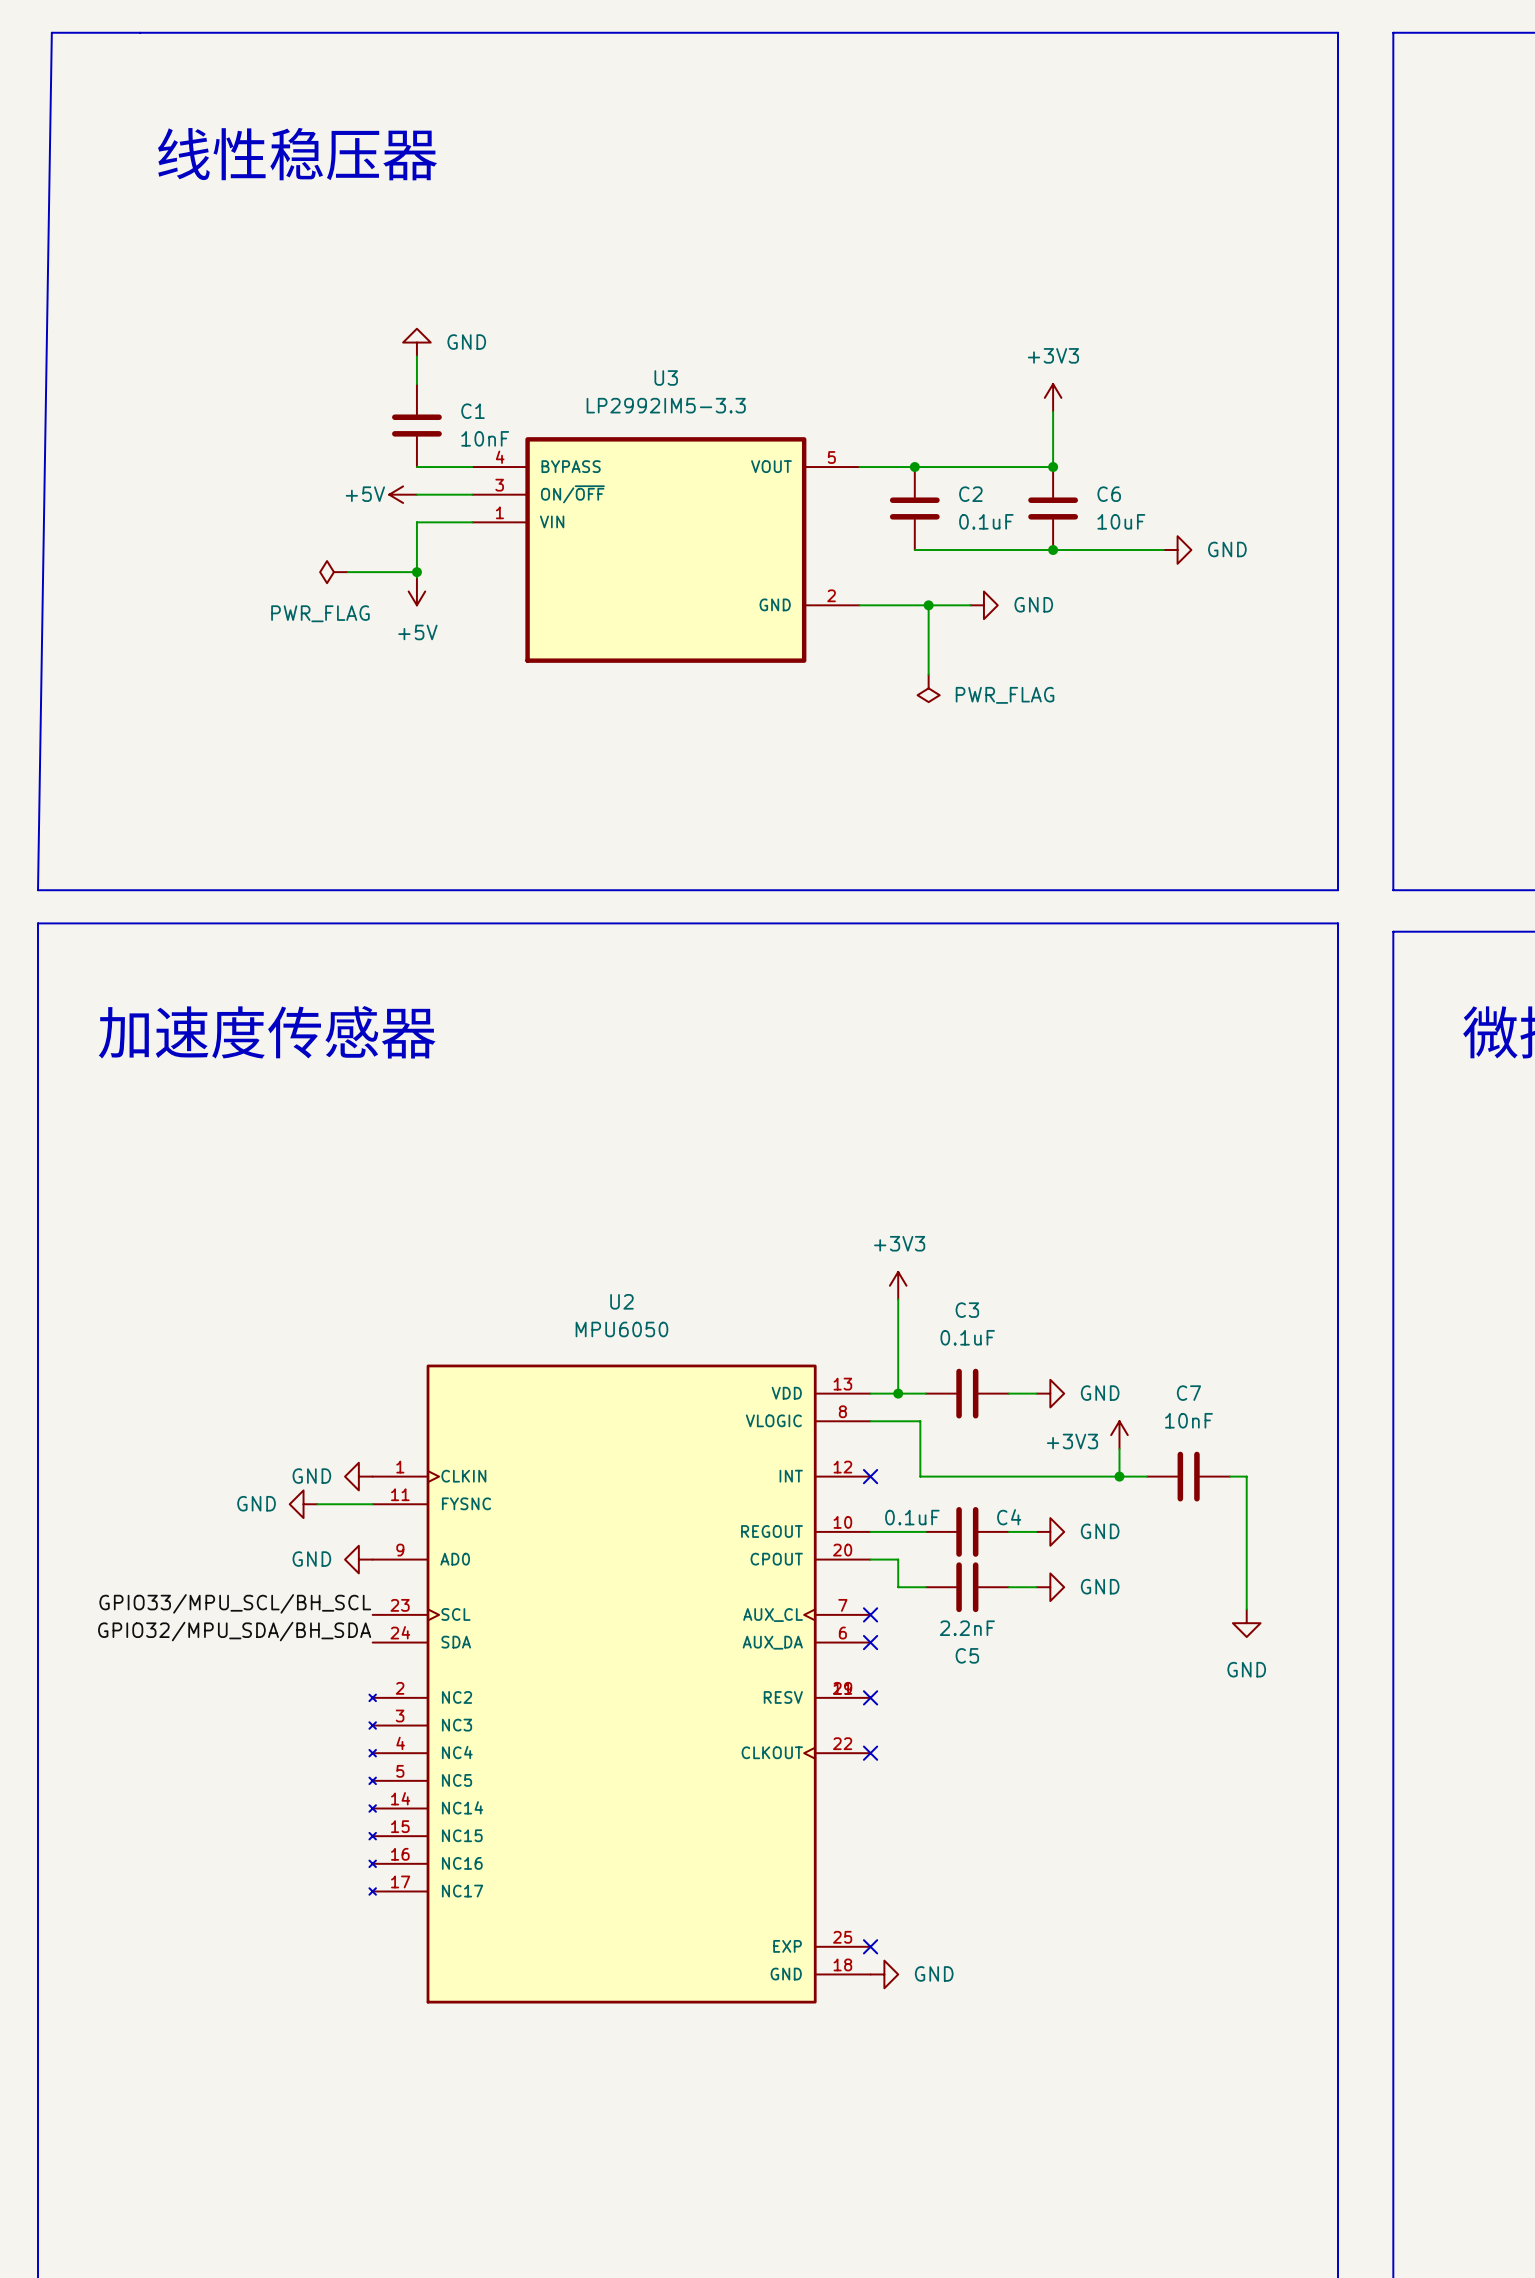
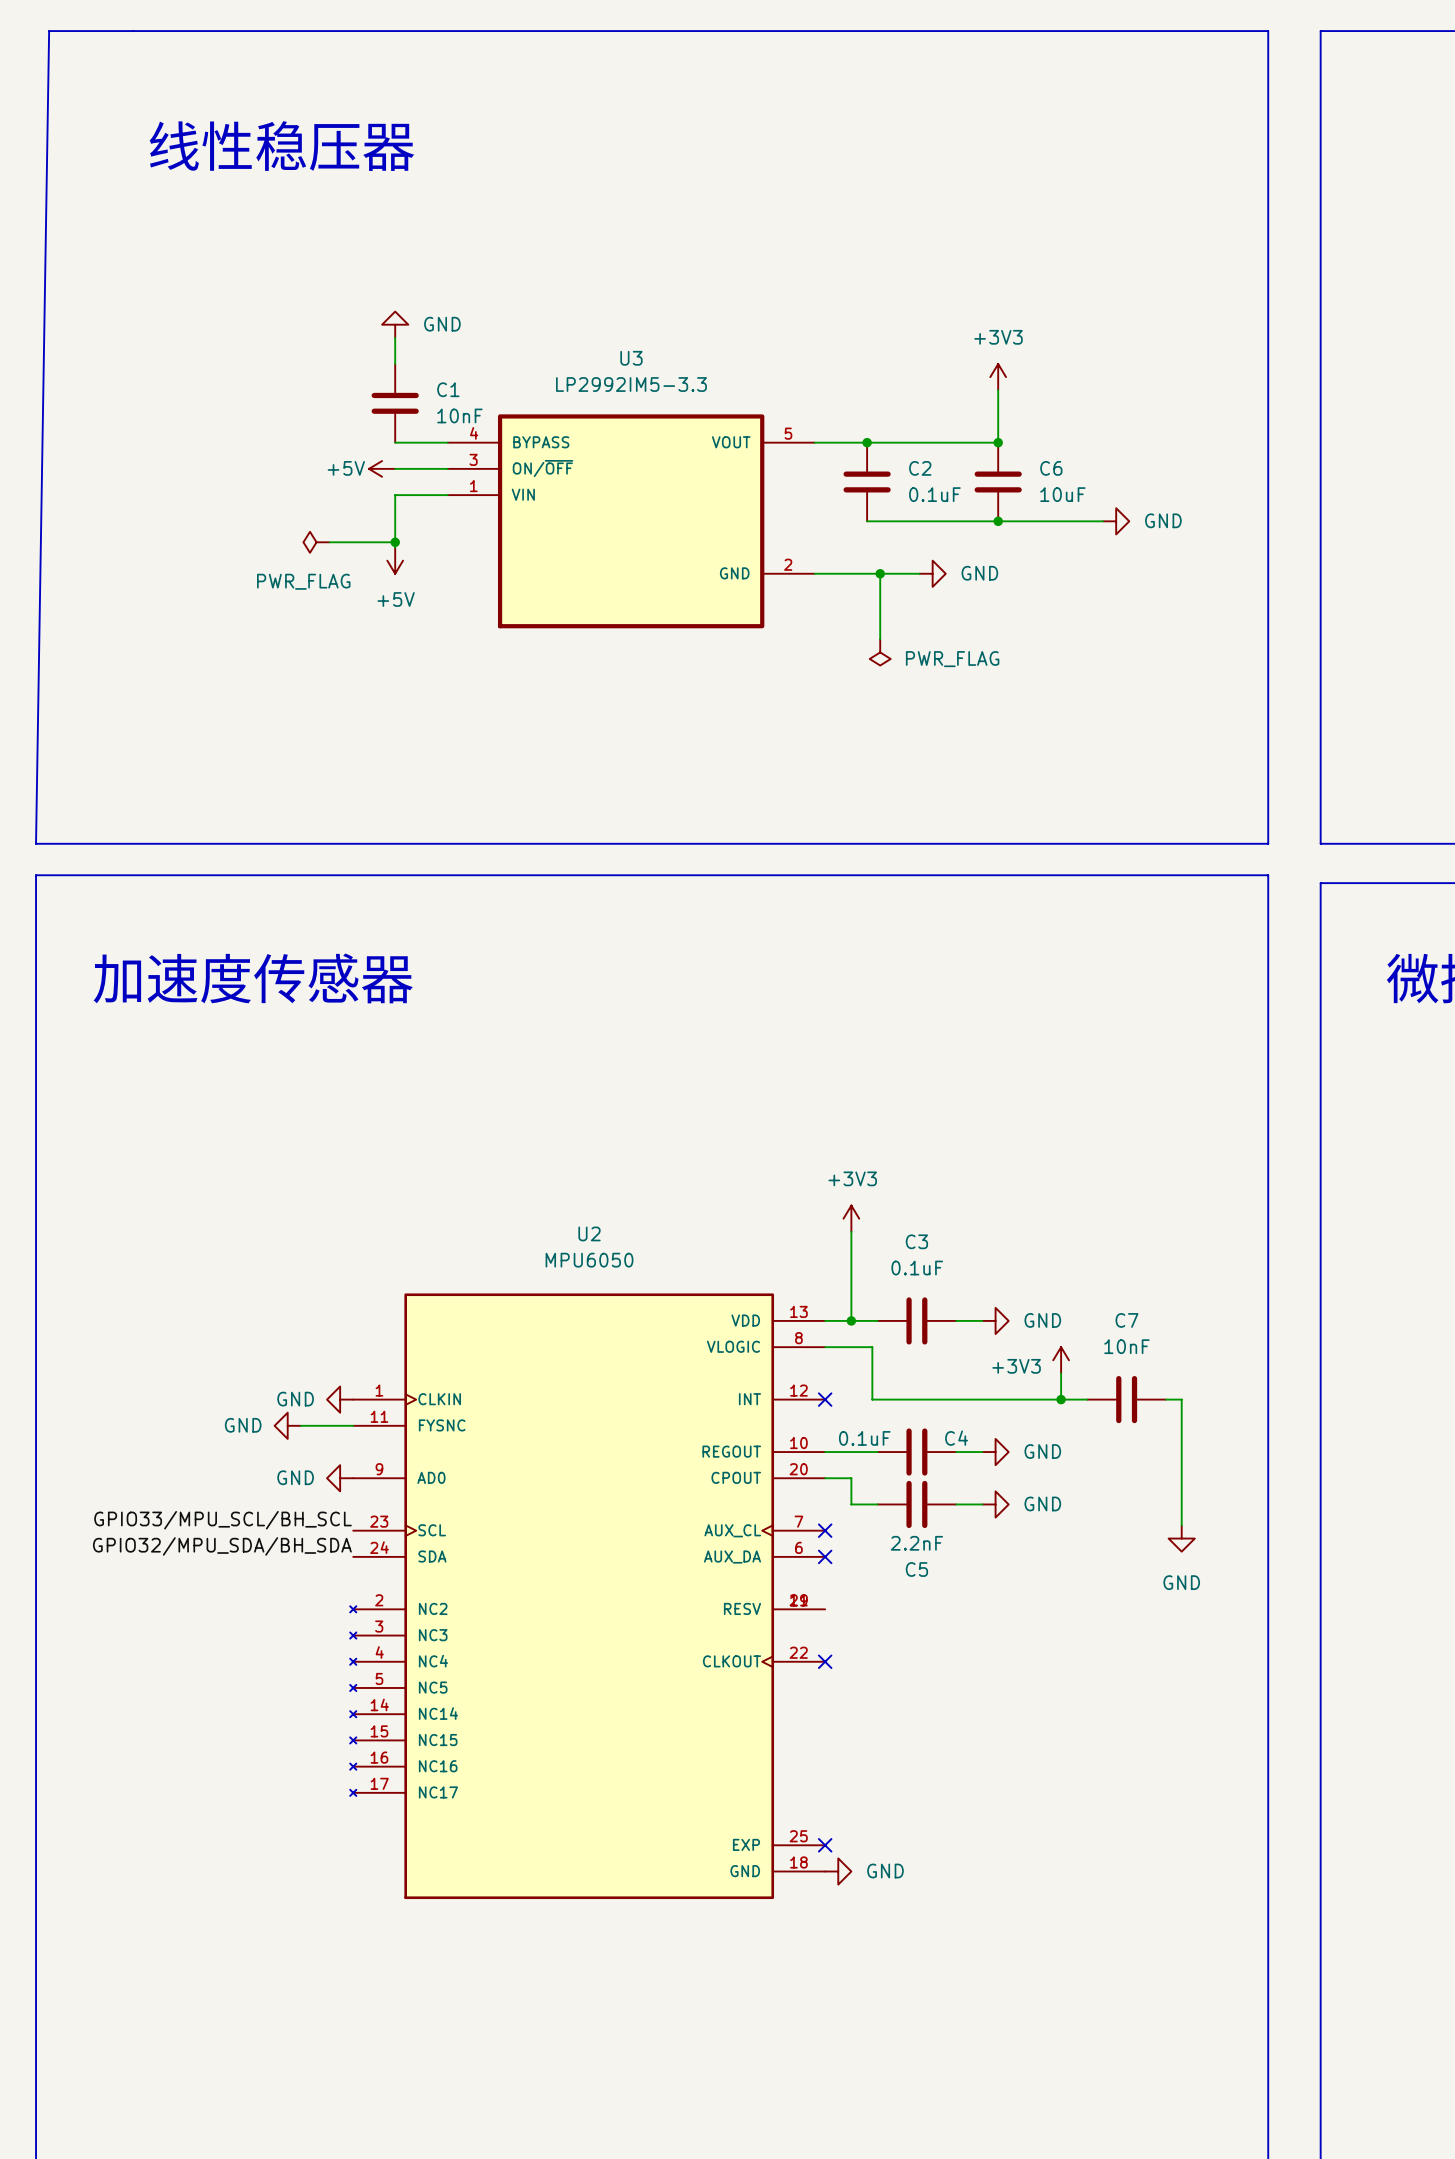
no-connect mark: (870, 1697) -> none

